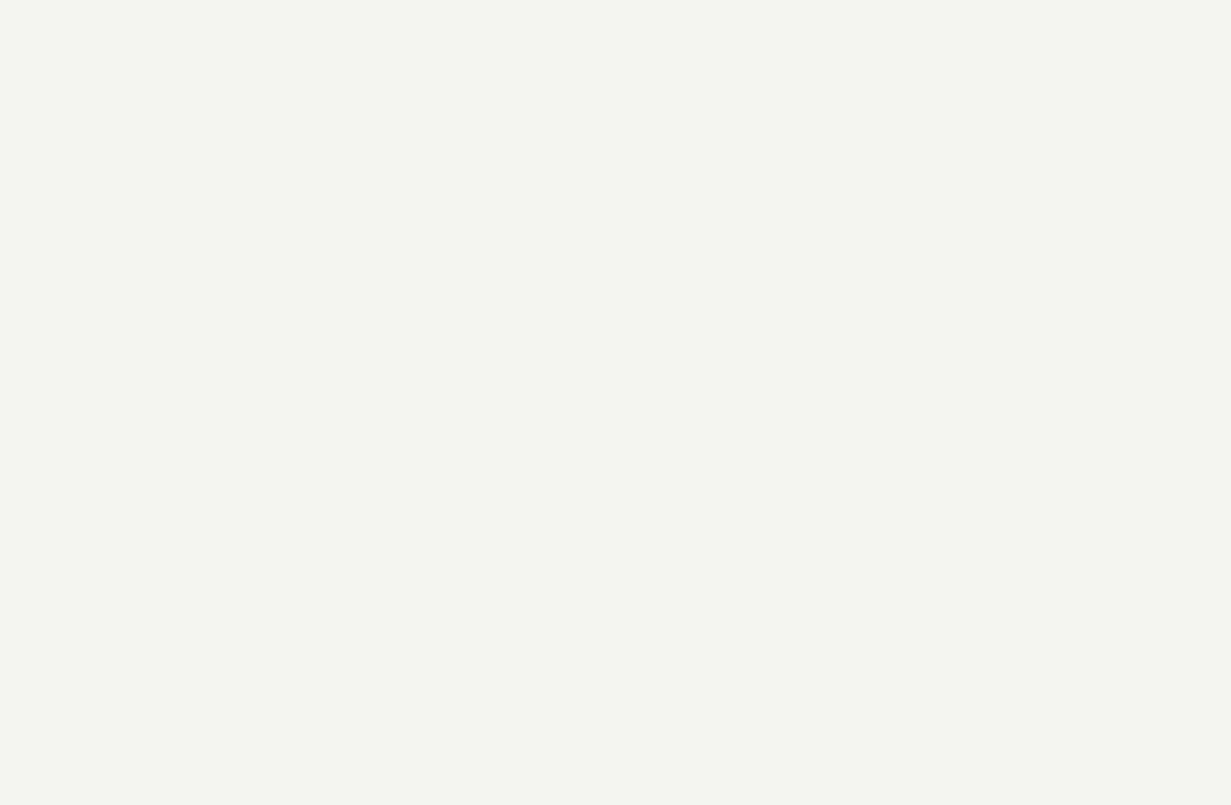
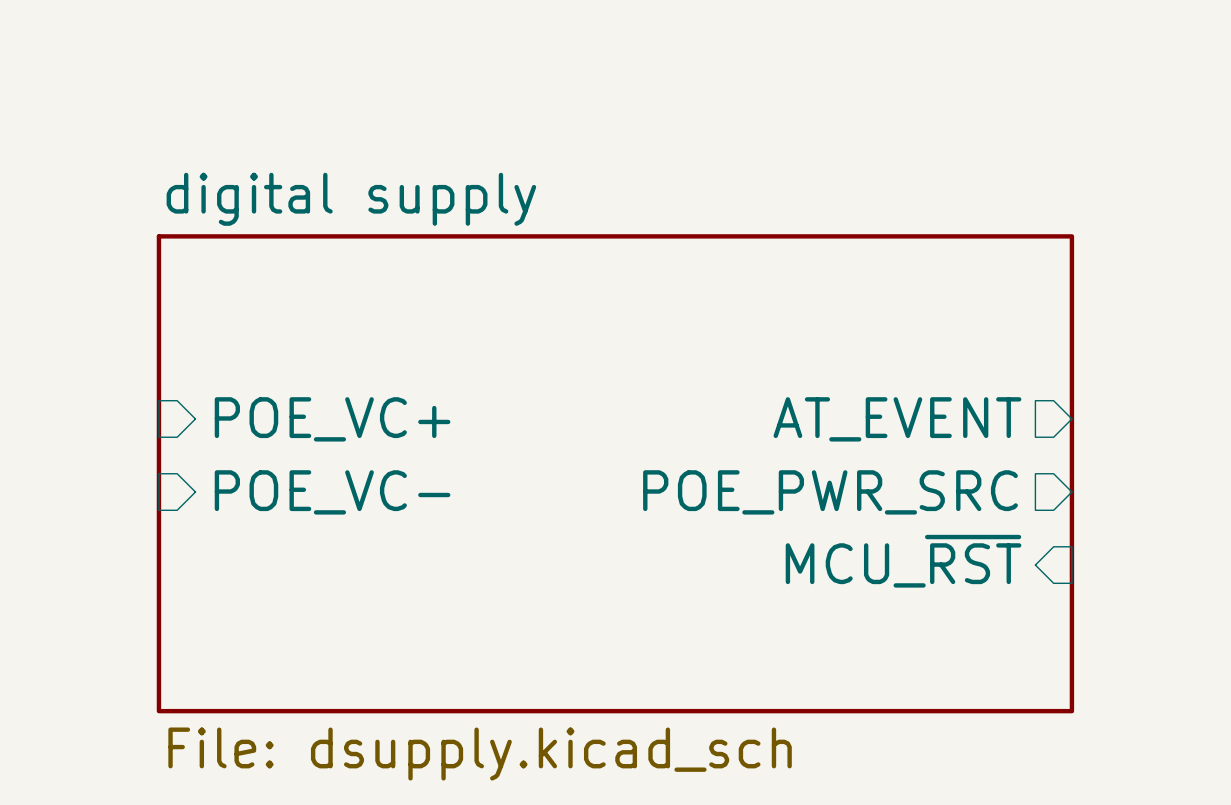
sheet pin: none -> POE_VC+ (332, 419)
sheet pin: none -> AT_EVENT (897, 419)
sheet digital supply: none -> File: dsupply.kicad_sch (615, 473)
sheet pin: none -> POE_VC- (332, 492)
sheet pin: none -> POE_PWR_SRC (830, 492)
sheet pin: none -> MCU_~{RST} (903, 561)

